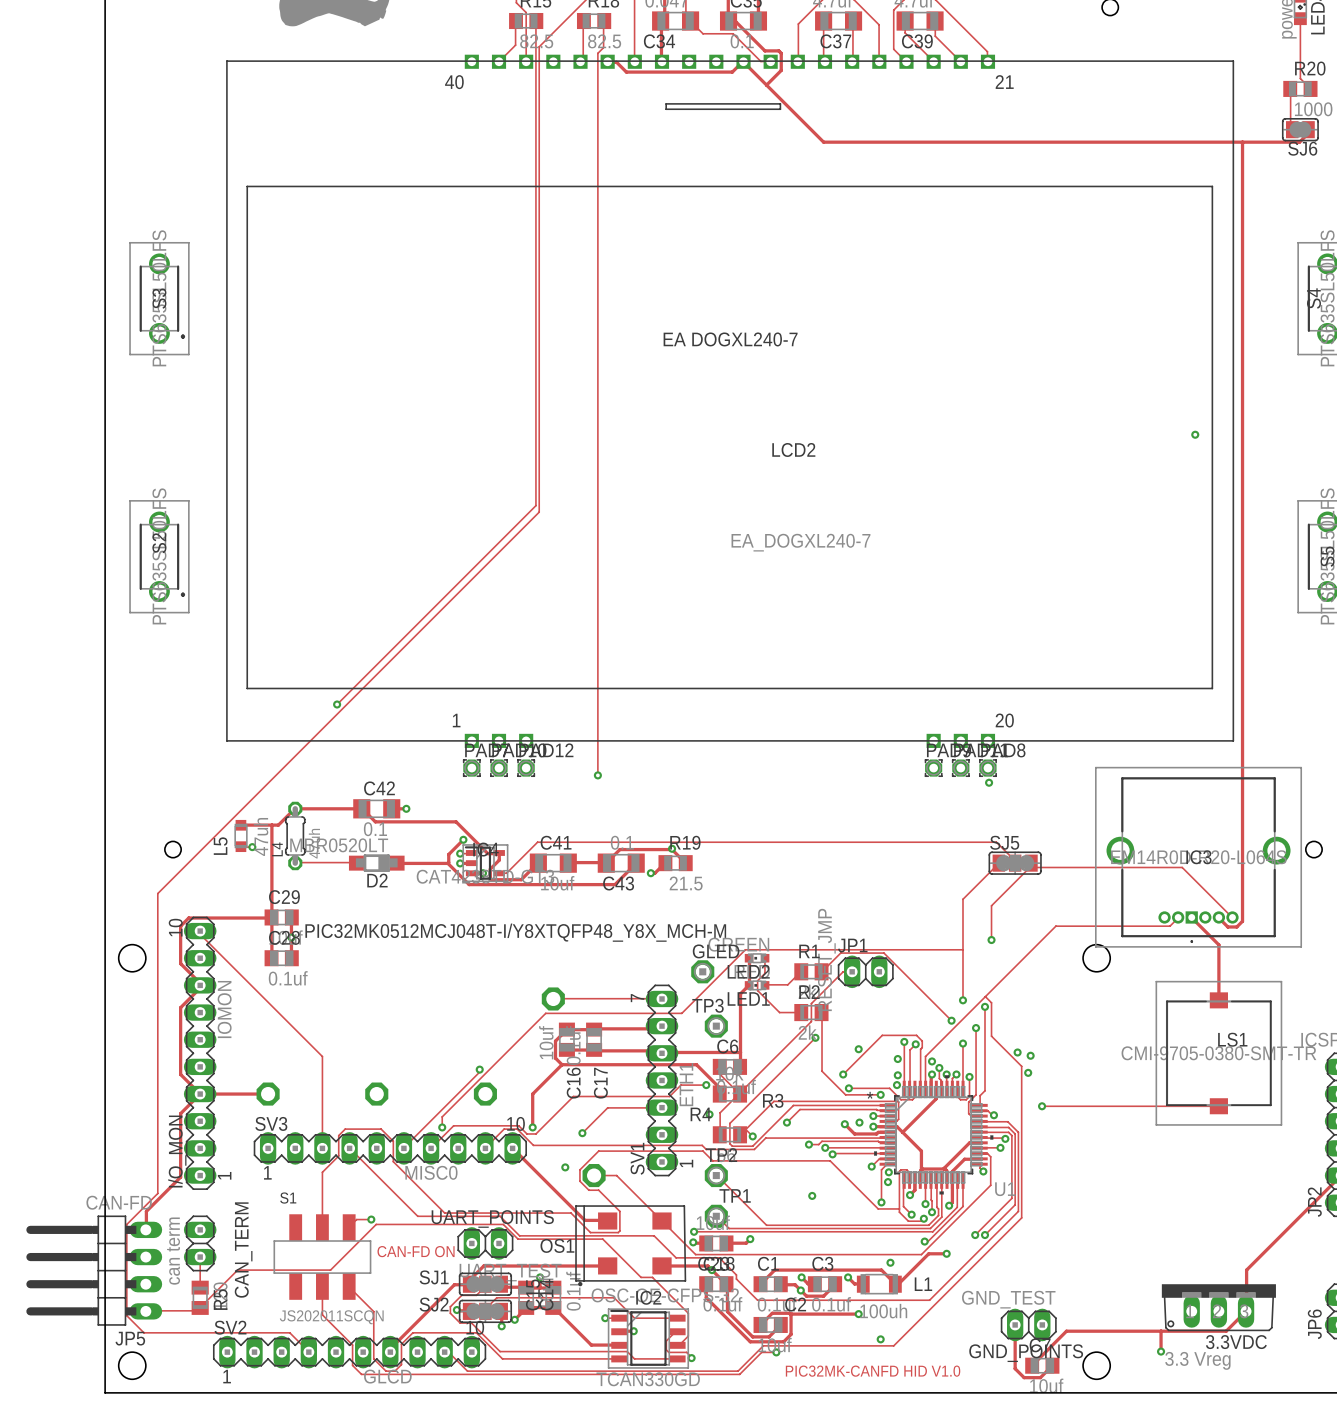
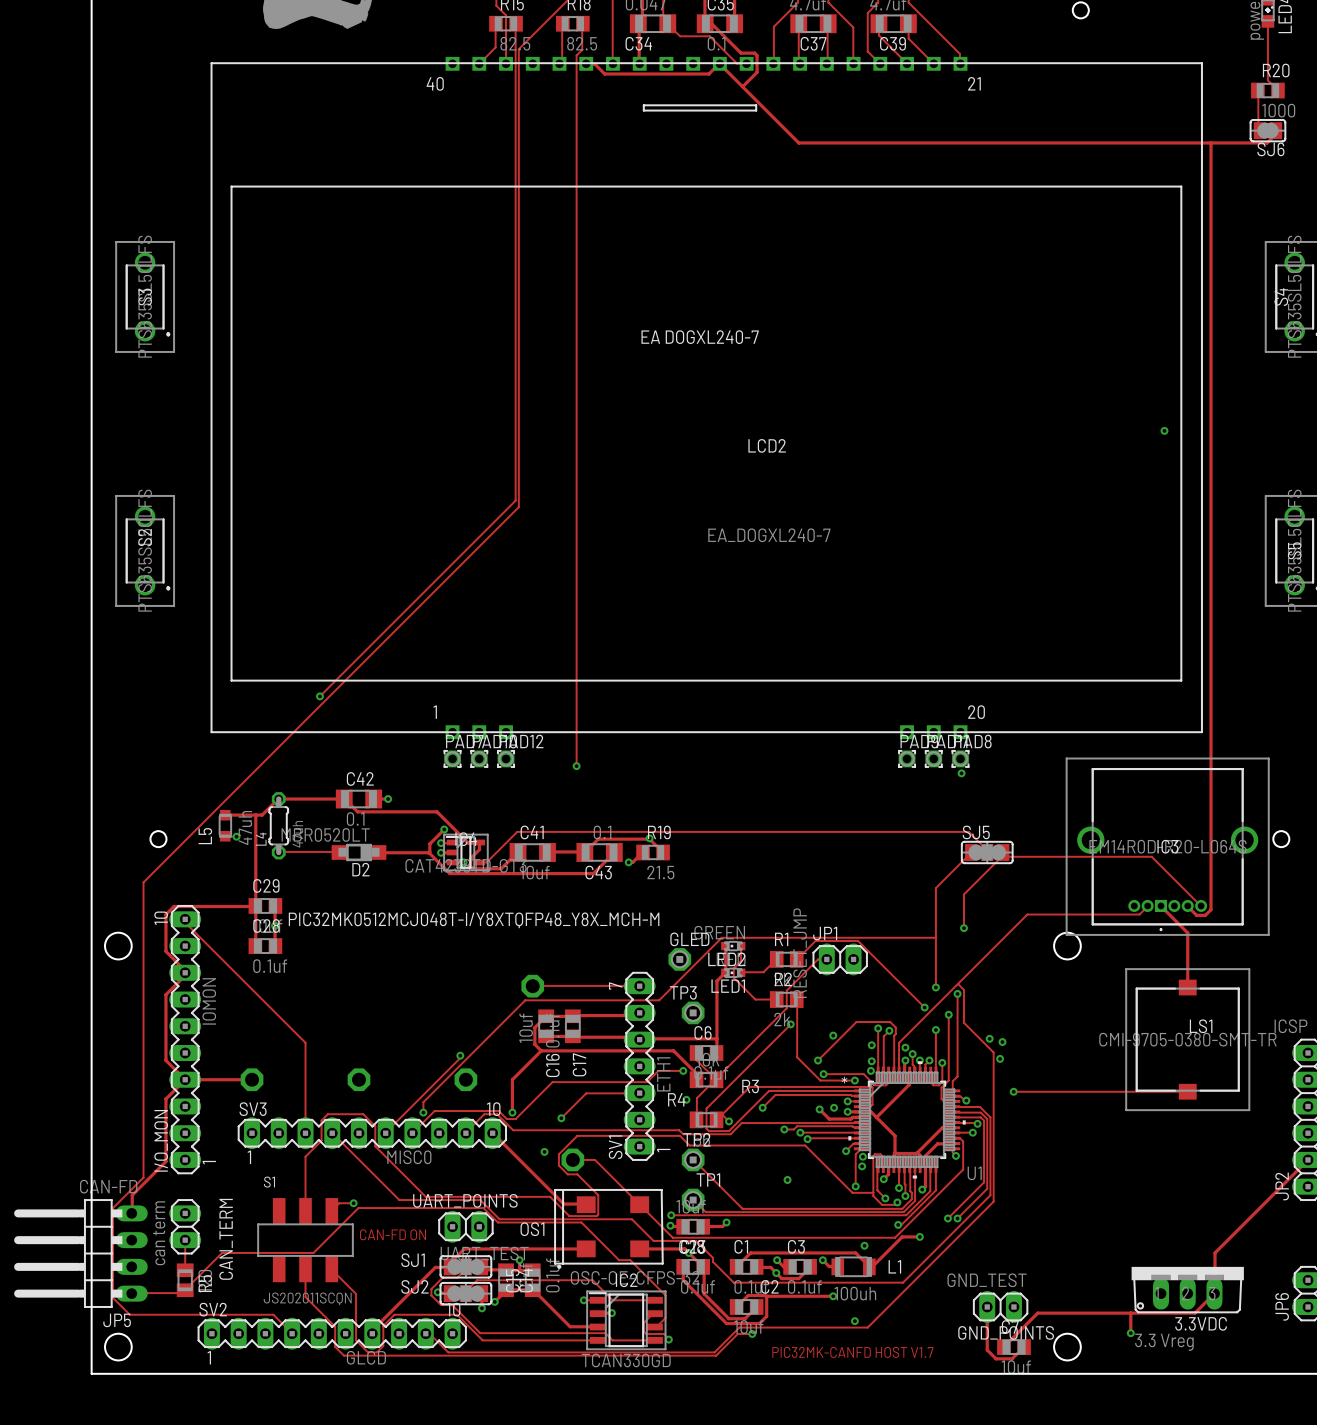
text: PIC32MK-CANFD HID V1.0 (873, 1371) -> PIC32MK-CANFD HOST V1.7 (852, 1352)

